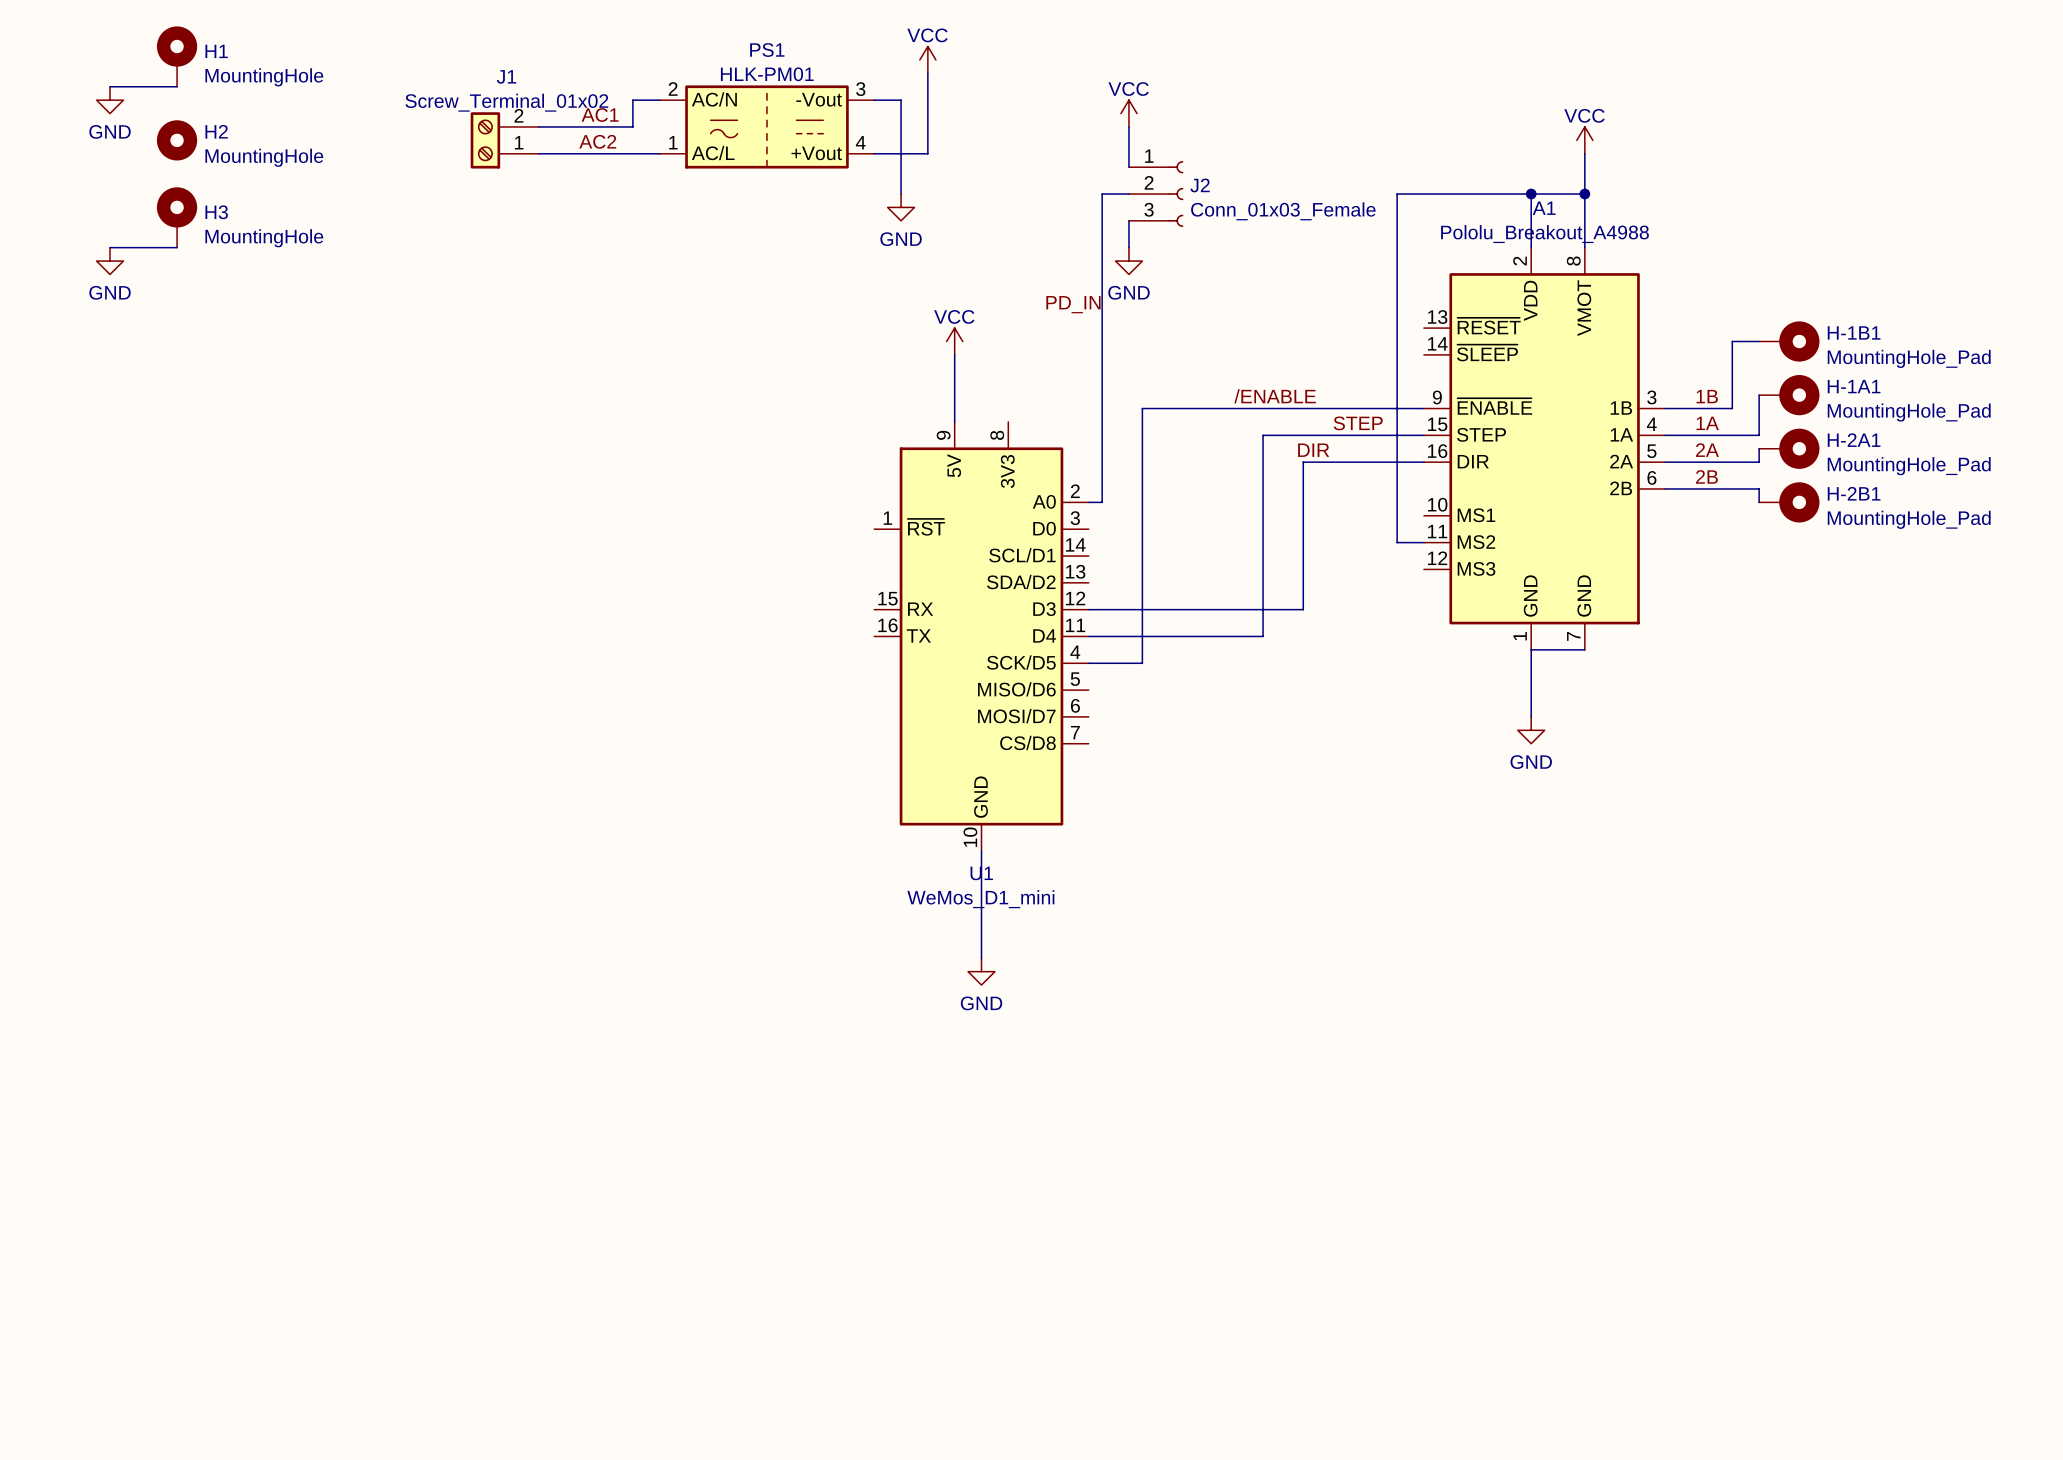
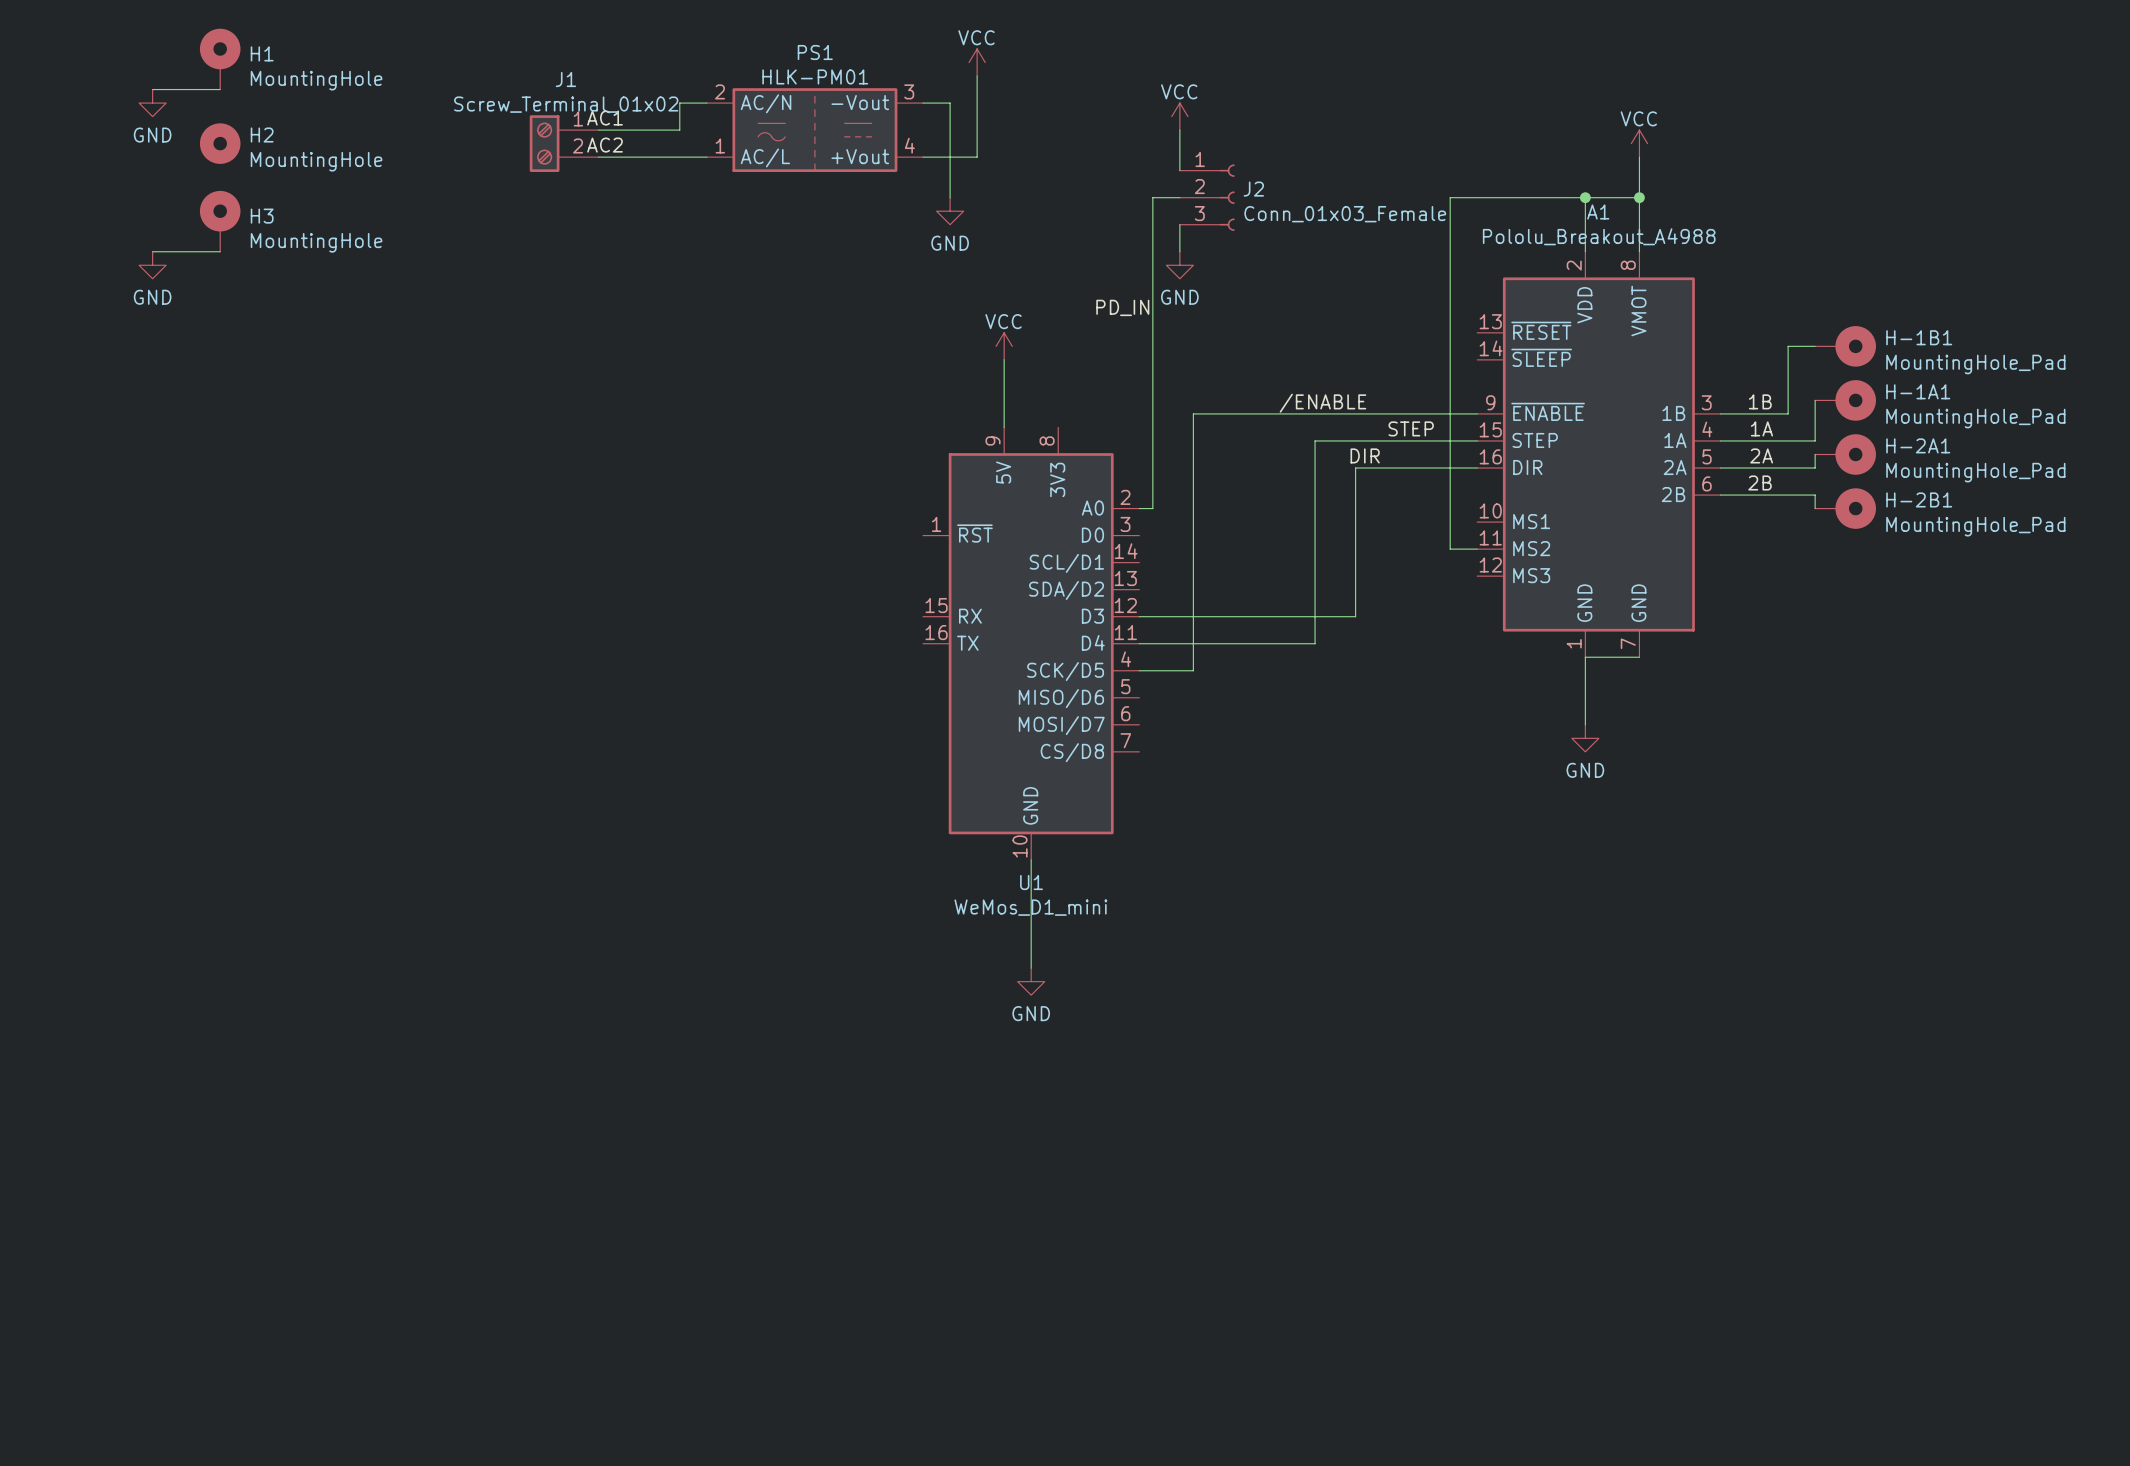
label position: AC1 (600, 115) -> AC1 (605, 118)
J1 flip: as is (485, 140) -> up-down (544, 143)
label position: AC2 (597, 141) -> AC2 (605, 145)

